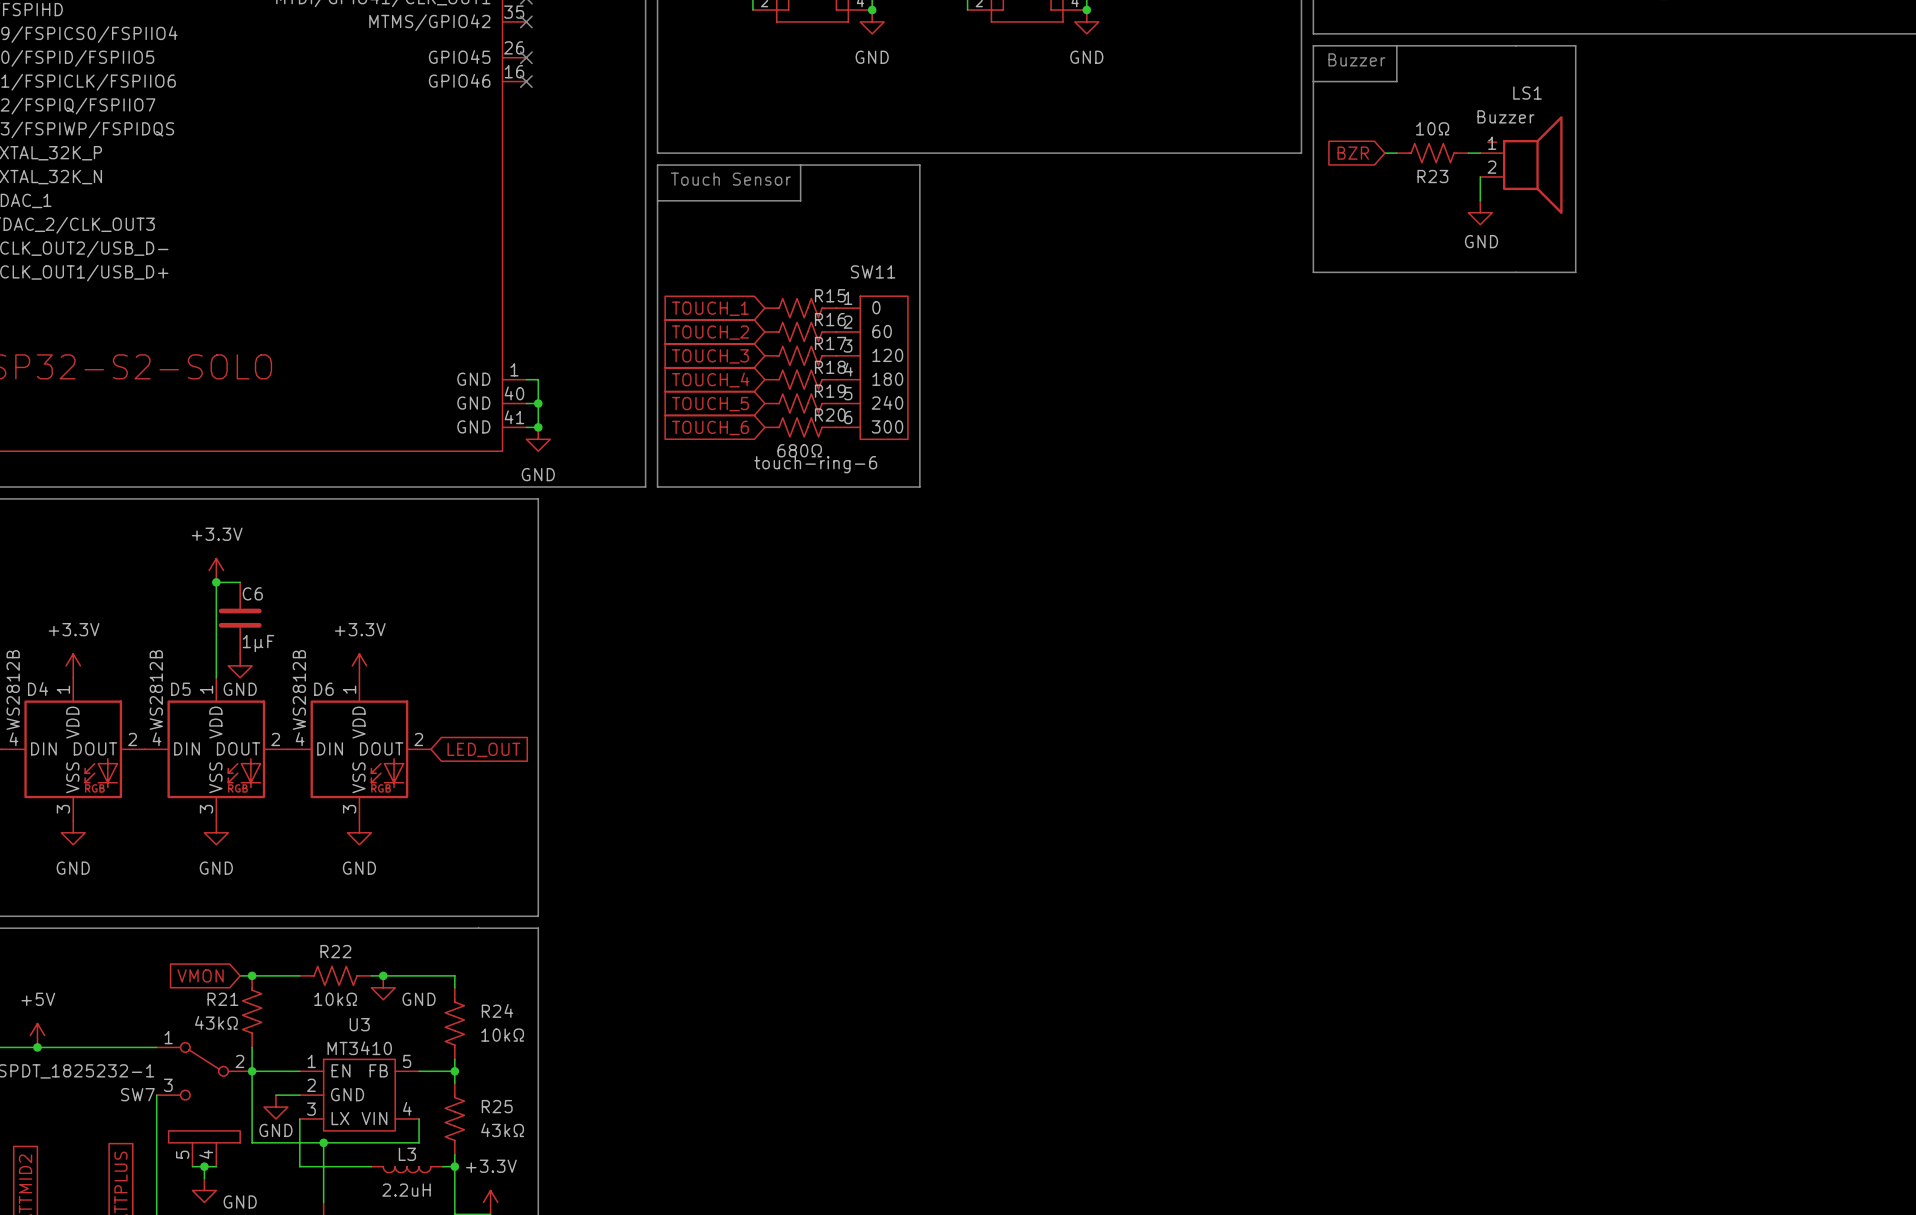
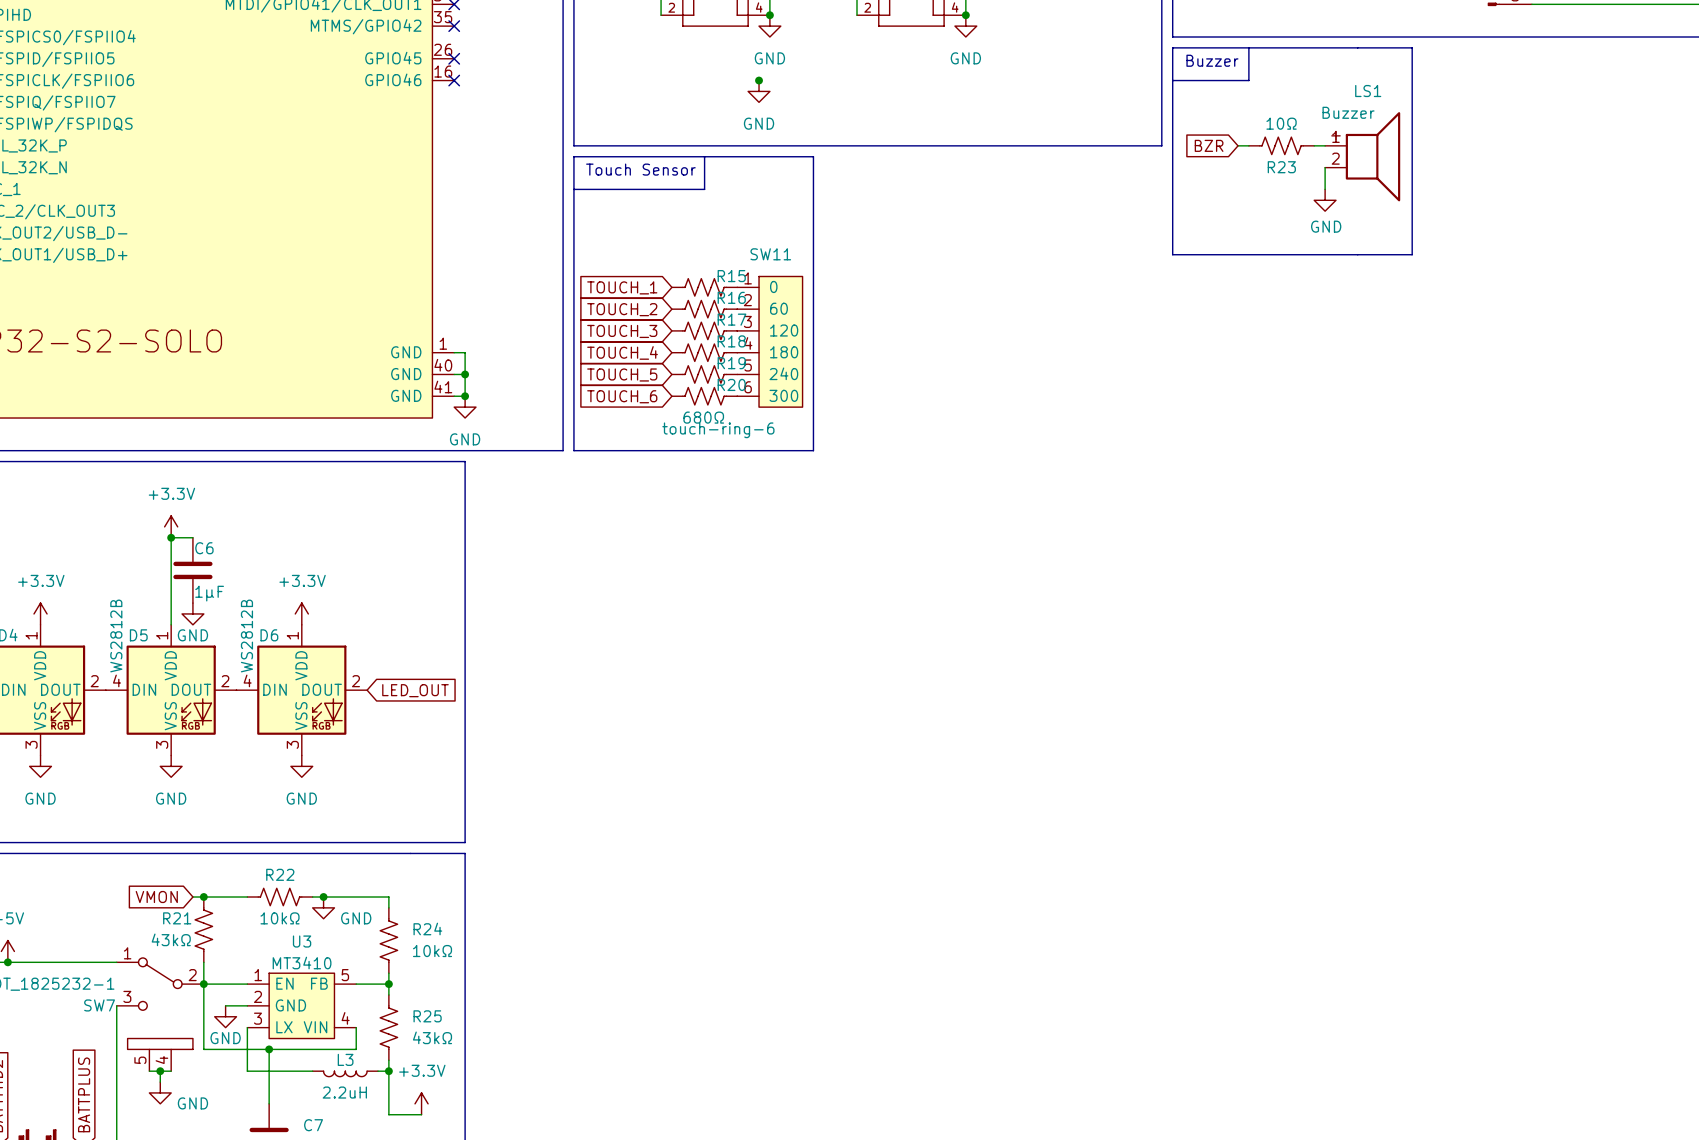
junction: none -> (759, 80)
power symbol: none -> GND (759, 91)

